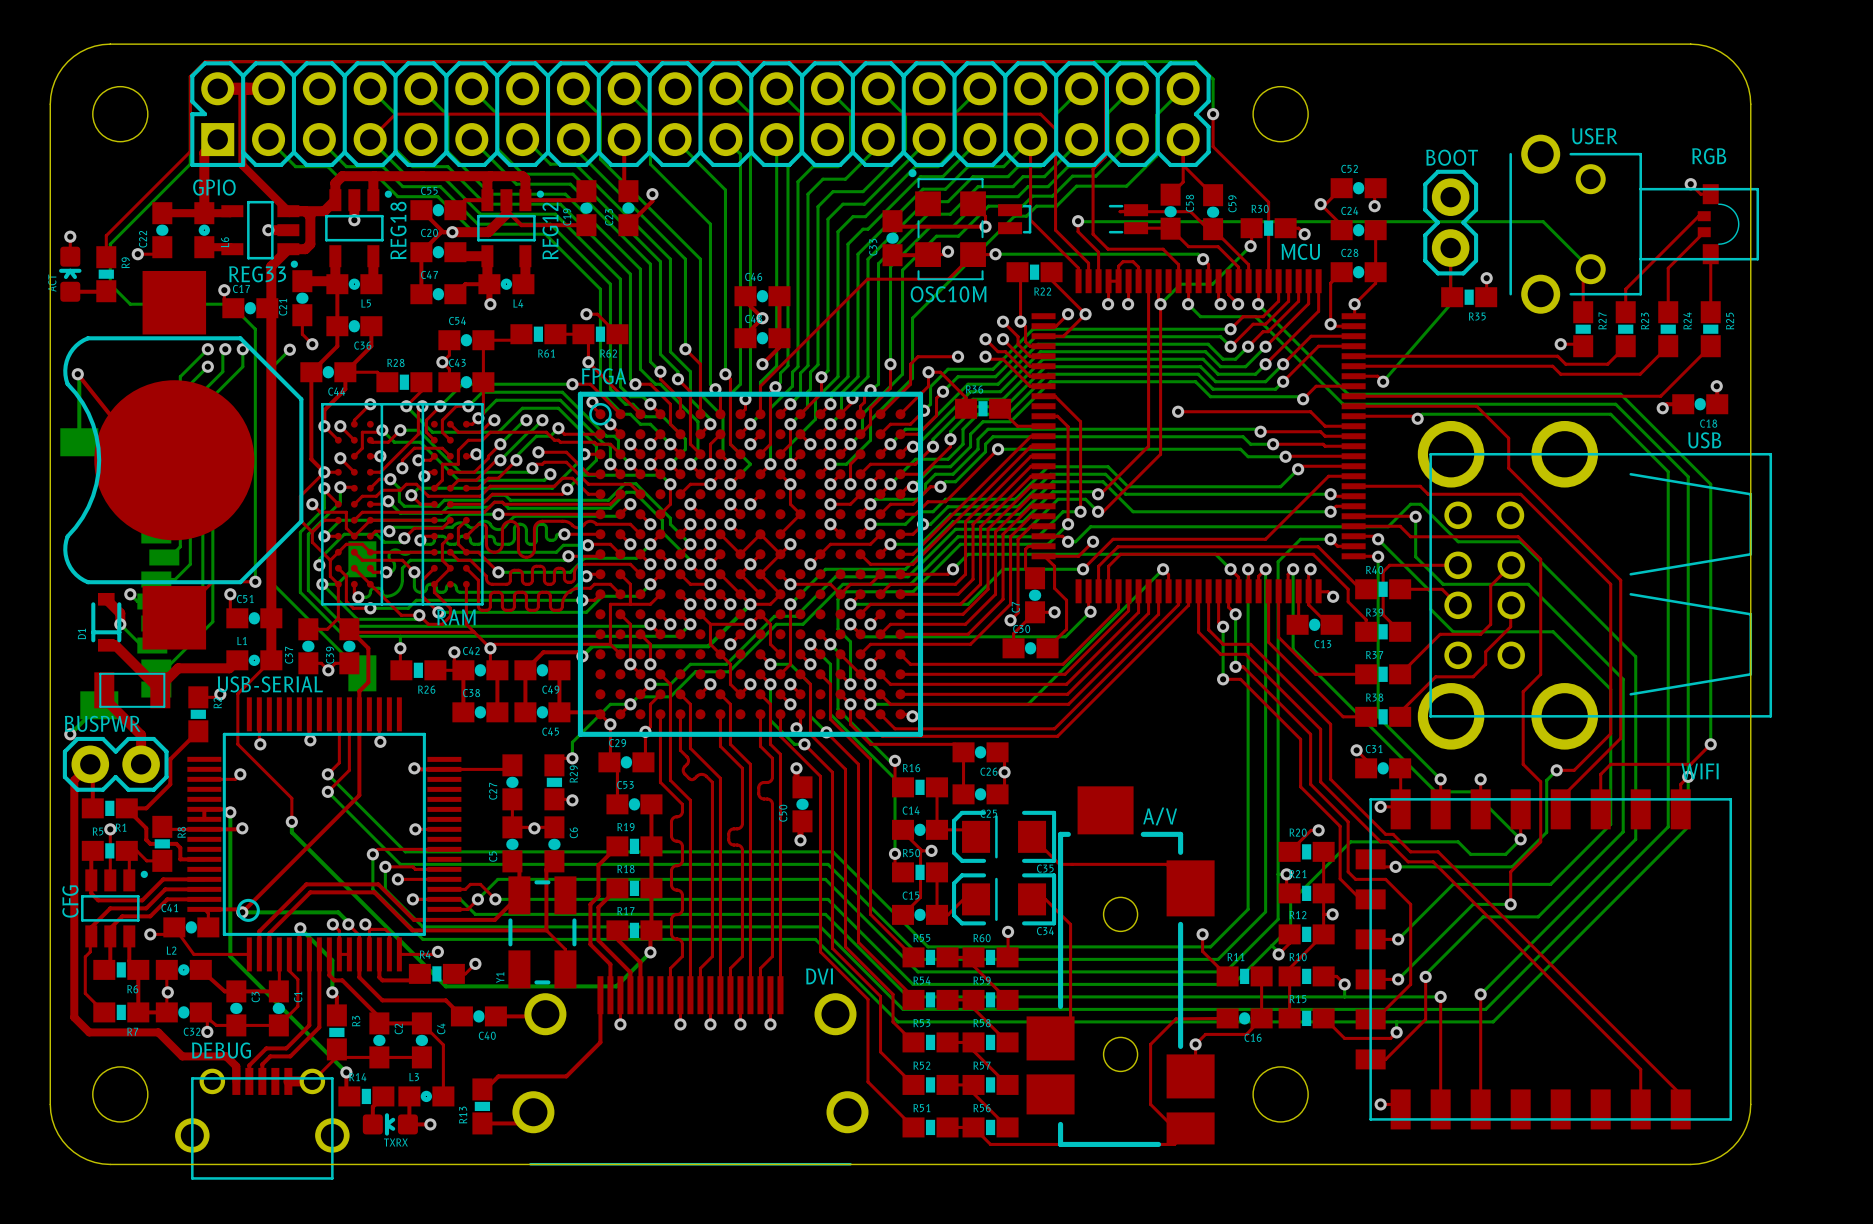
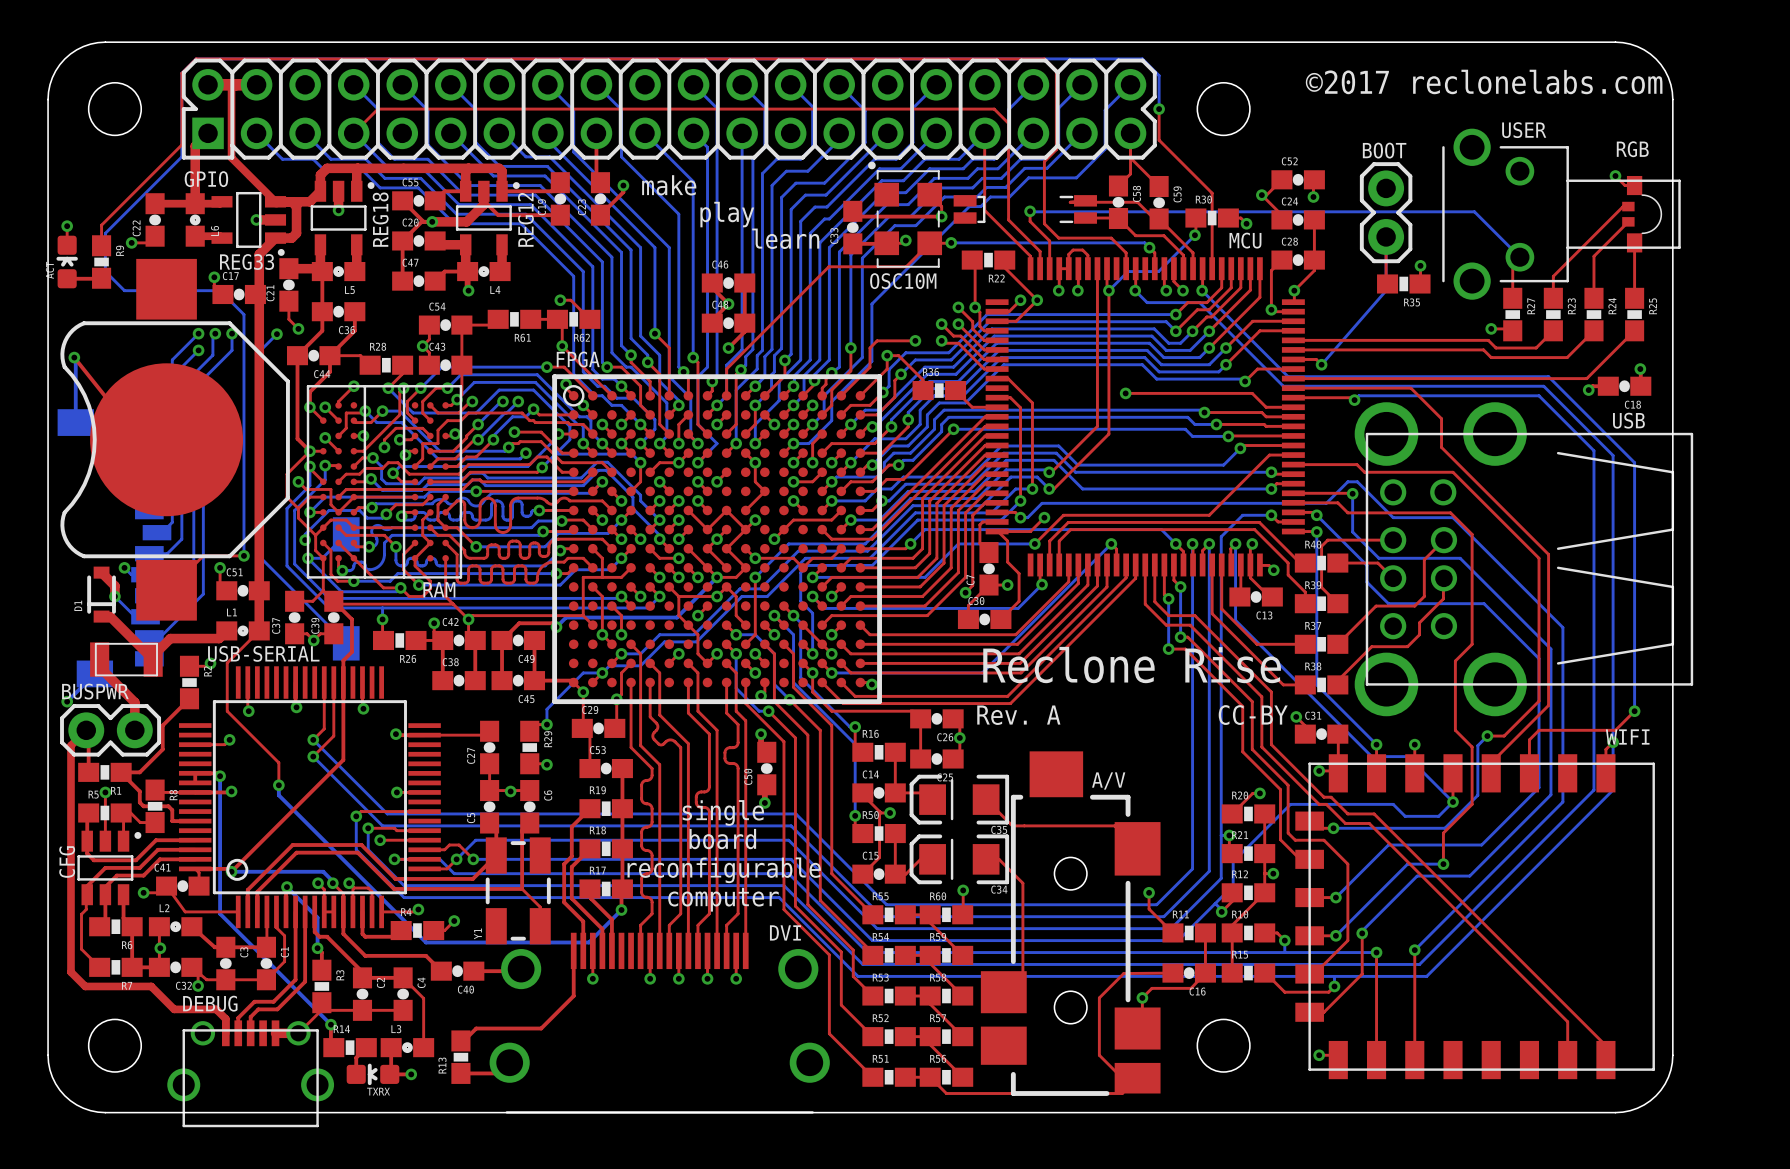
text: none -> ©2017 reclonelabs.com (1484, 81)
text: none -> make (669, 185)
text: none -> play (727, 214)
text: none -> learn (785, 238)
text: none -> Reclone Rise (1132, 665)
text: none -> Rev. A CC-BY (1132, 715)
text: none -> single (723, 812)
text: none -> board (722, 839)
text: none -> reconfigurable (724, 870)
text: none -> computer (723, 899)

